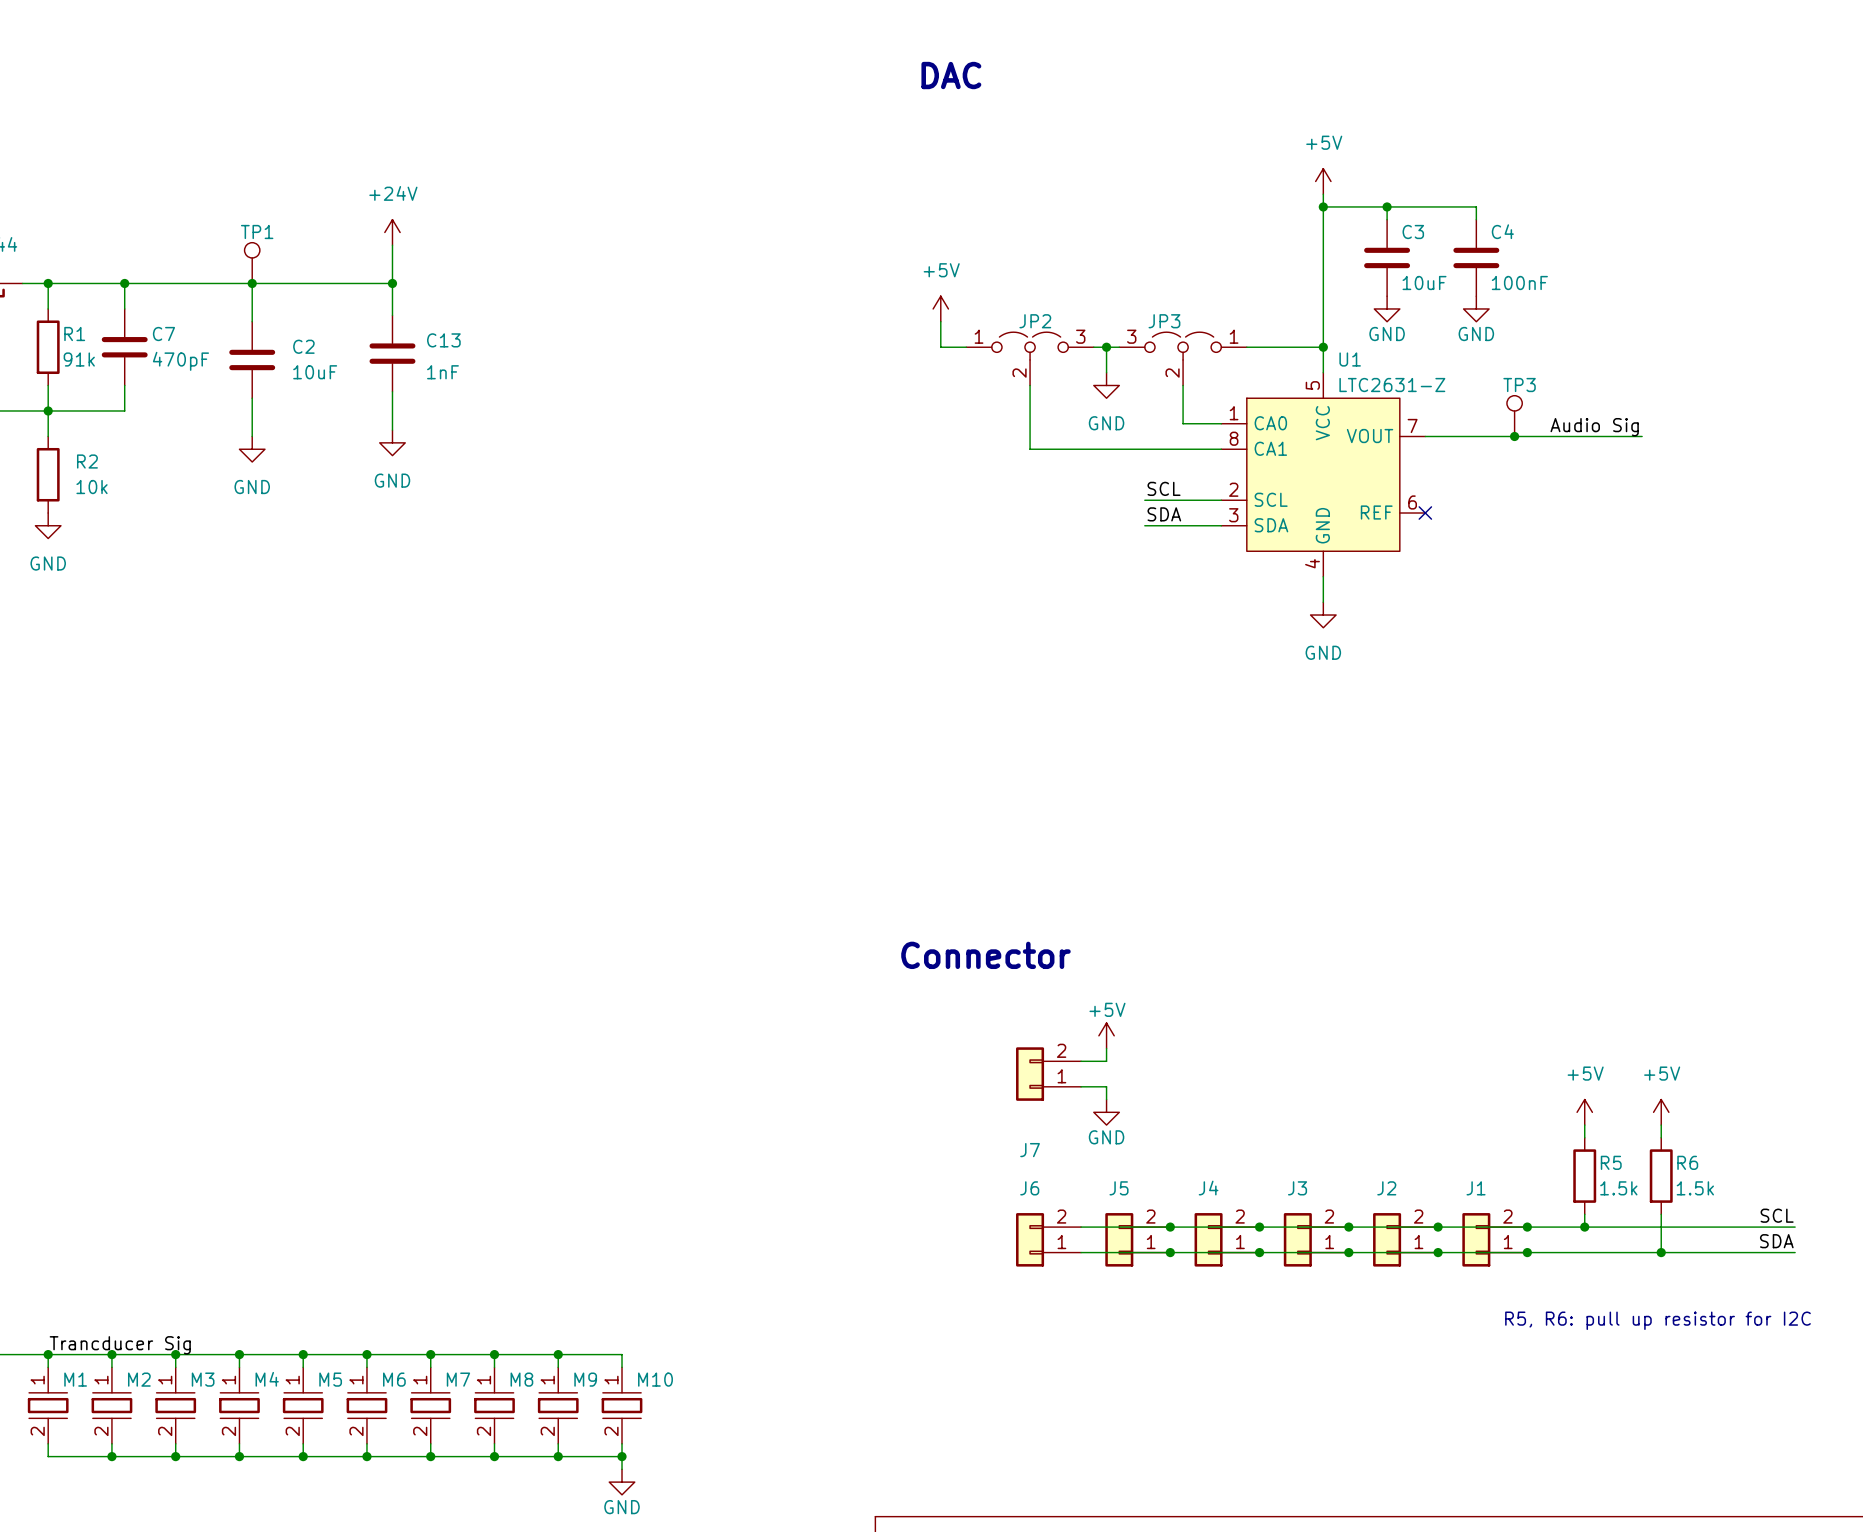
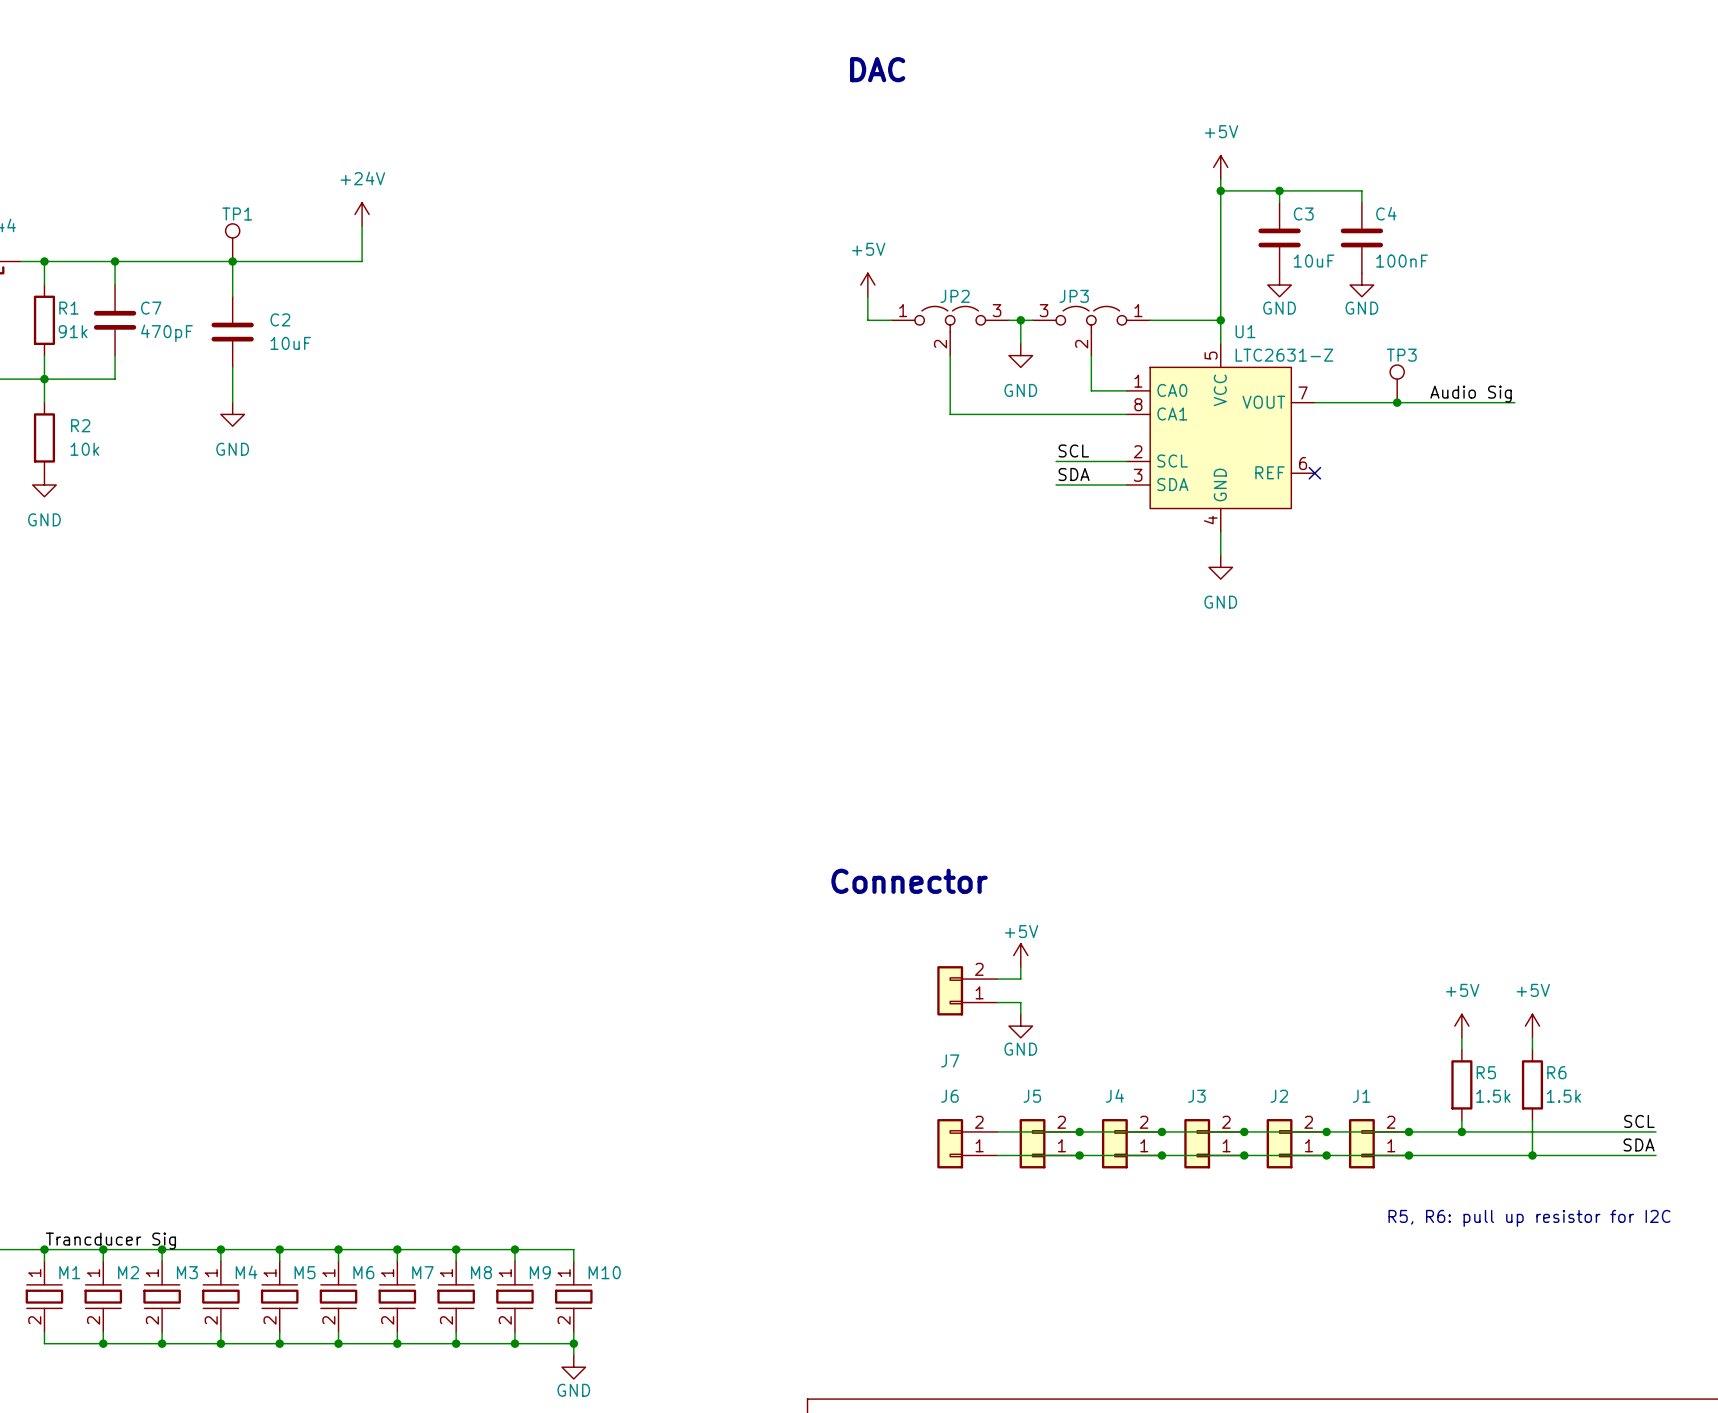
wire: (392, 283) (392, 315) -> none
junction: (392, 283) -> none
C13: 1nF (392, 353) -> none
wire: (392, 391) (392, 430) -> none
power symbol: GND (392, 442) -> none

